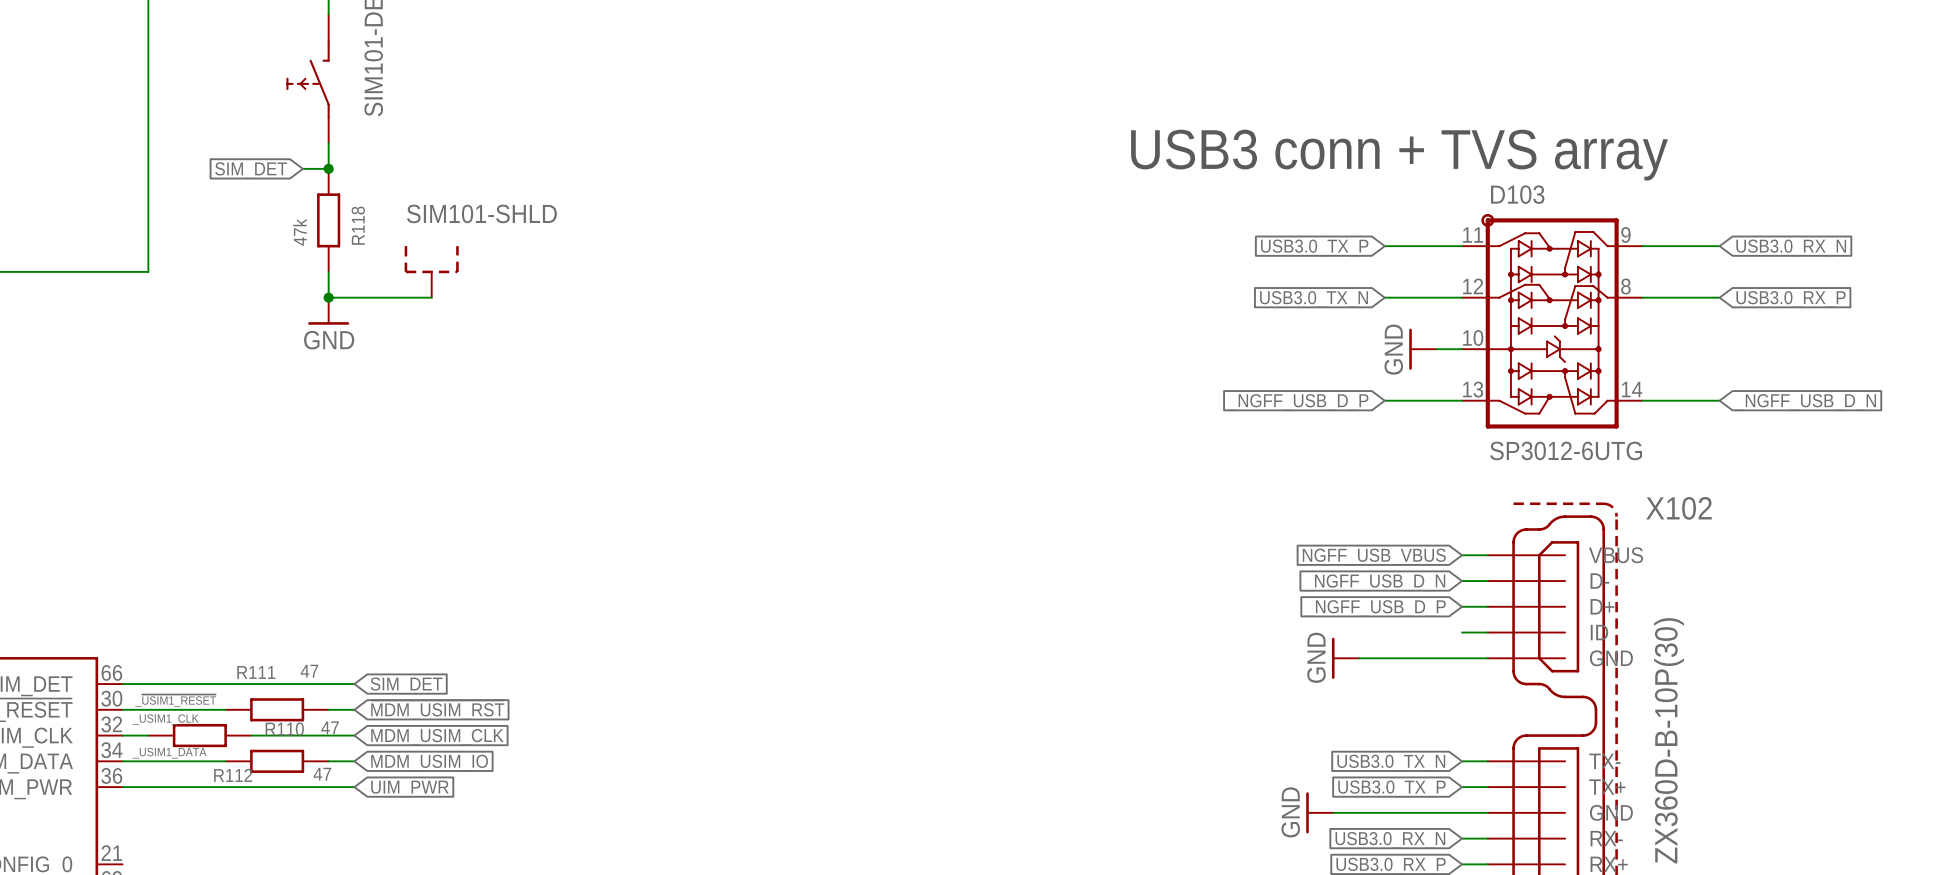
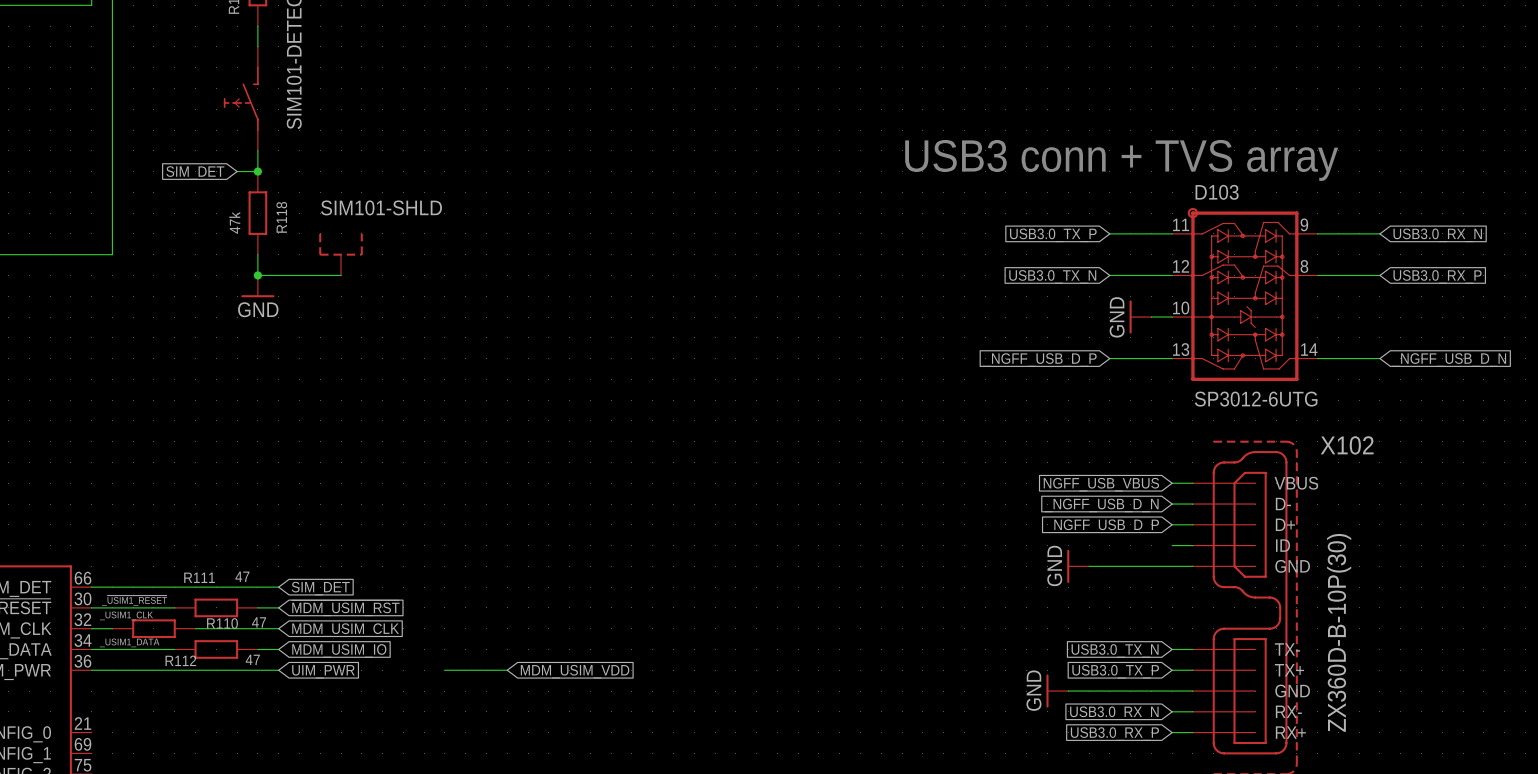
wire: none -> (444, 670) (507, 670)
global label: none -> MDM_USIM_VDD (575, 671)

